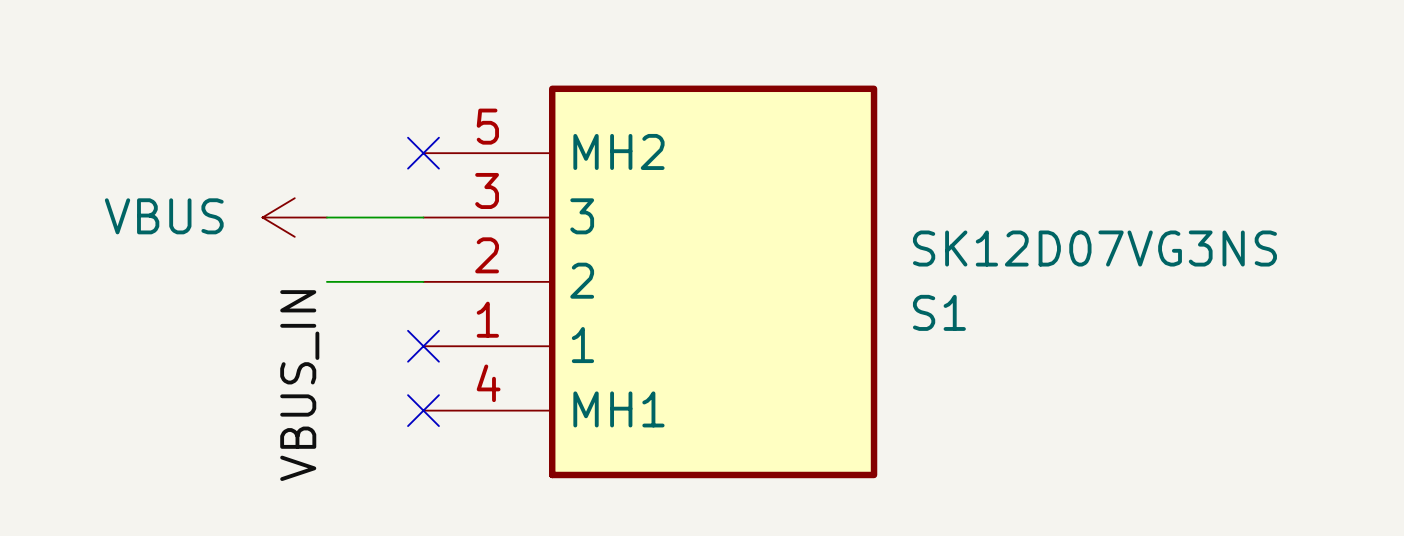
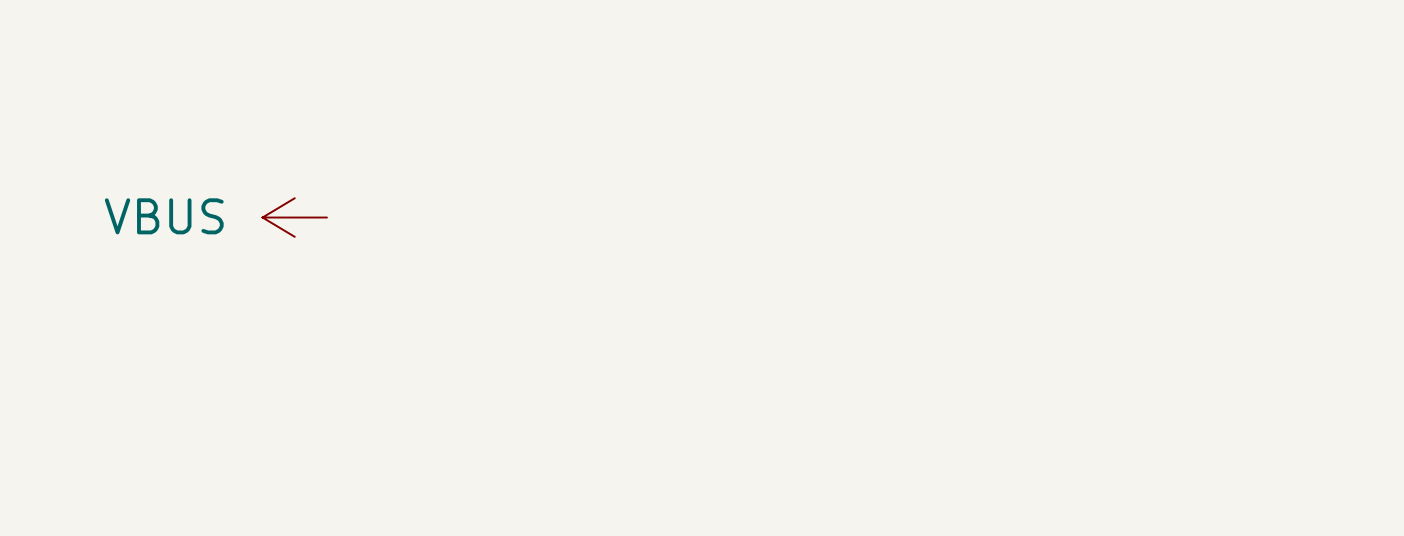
no-connect mark: (423, 153) -> none
wire: (326, 217) (423, 217) -> none
wire: (326, 281) (423, 281) -> none
S1: SK12D07VG3NS (650, 281) -> none
no-connect mark: (423, 346) -> none
label: VBUS_IN (299, 385) -> none
no-connect mark: (423, 410) -> none

